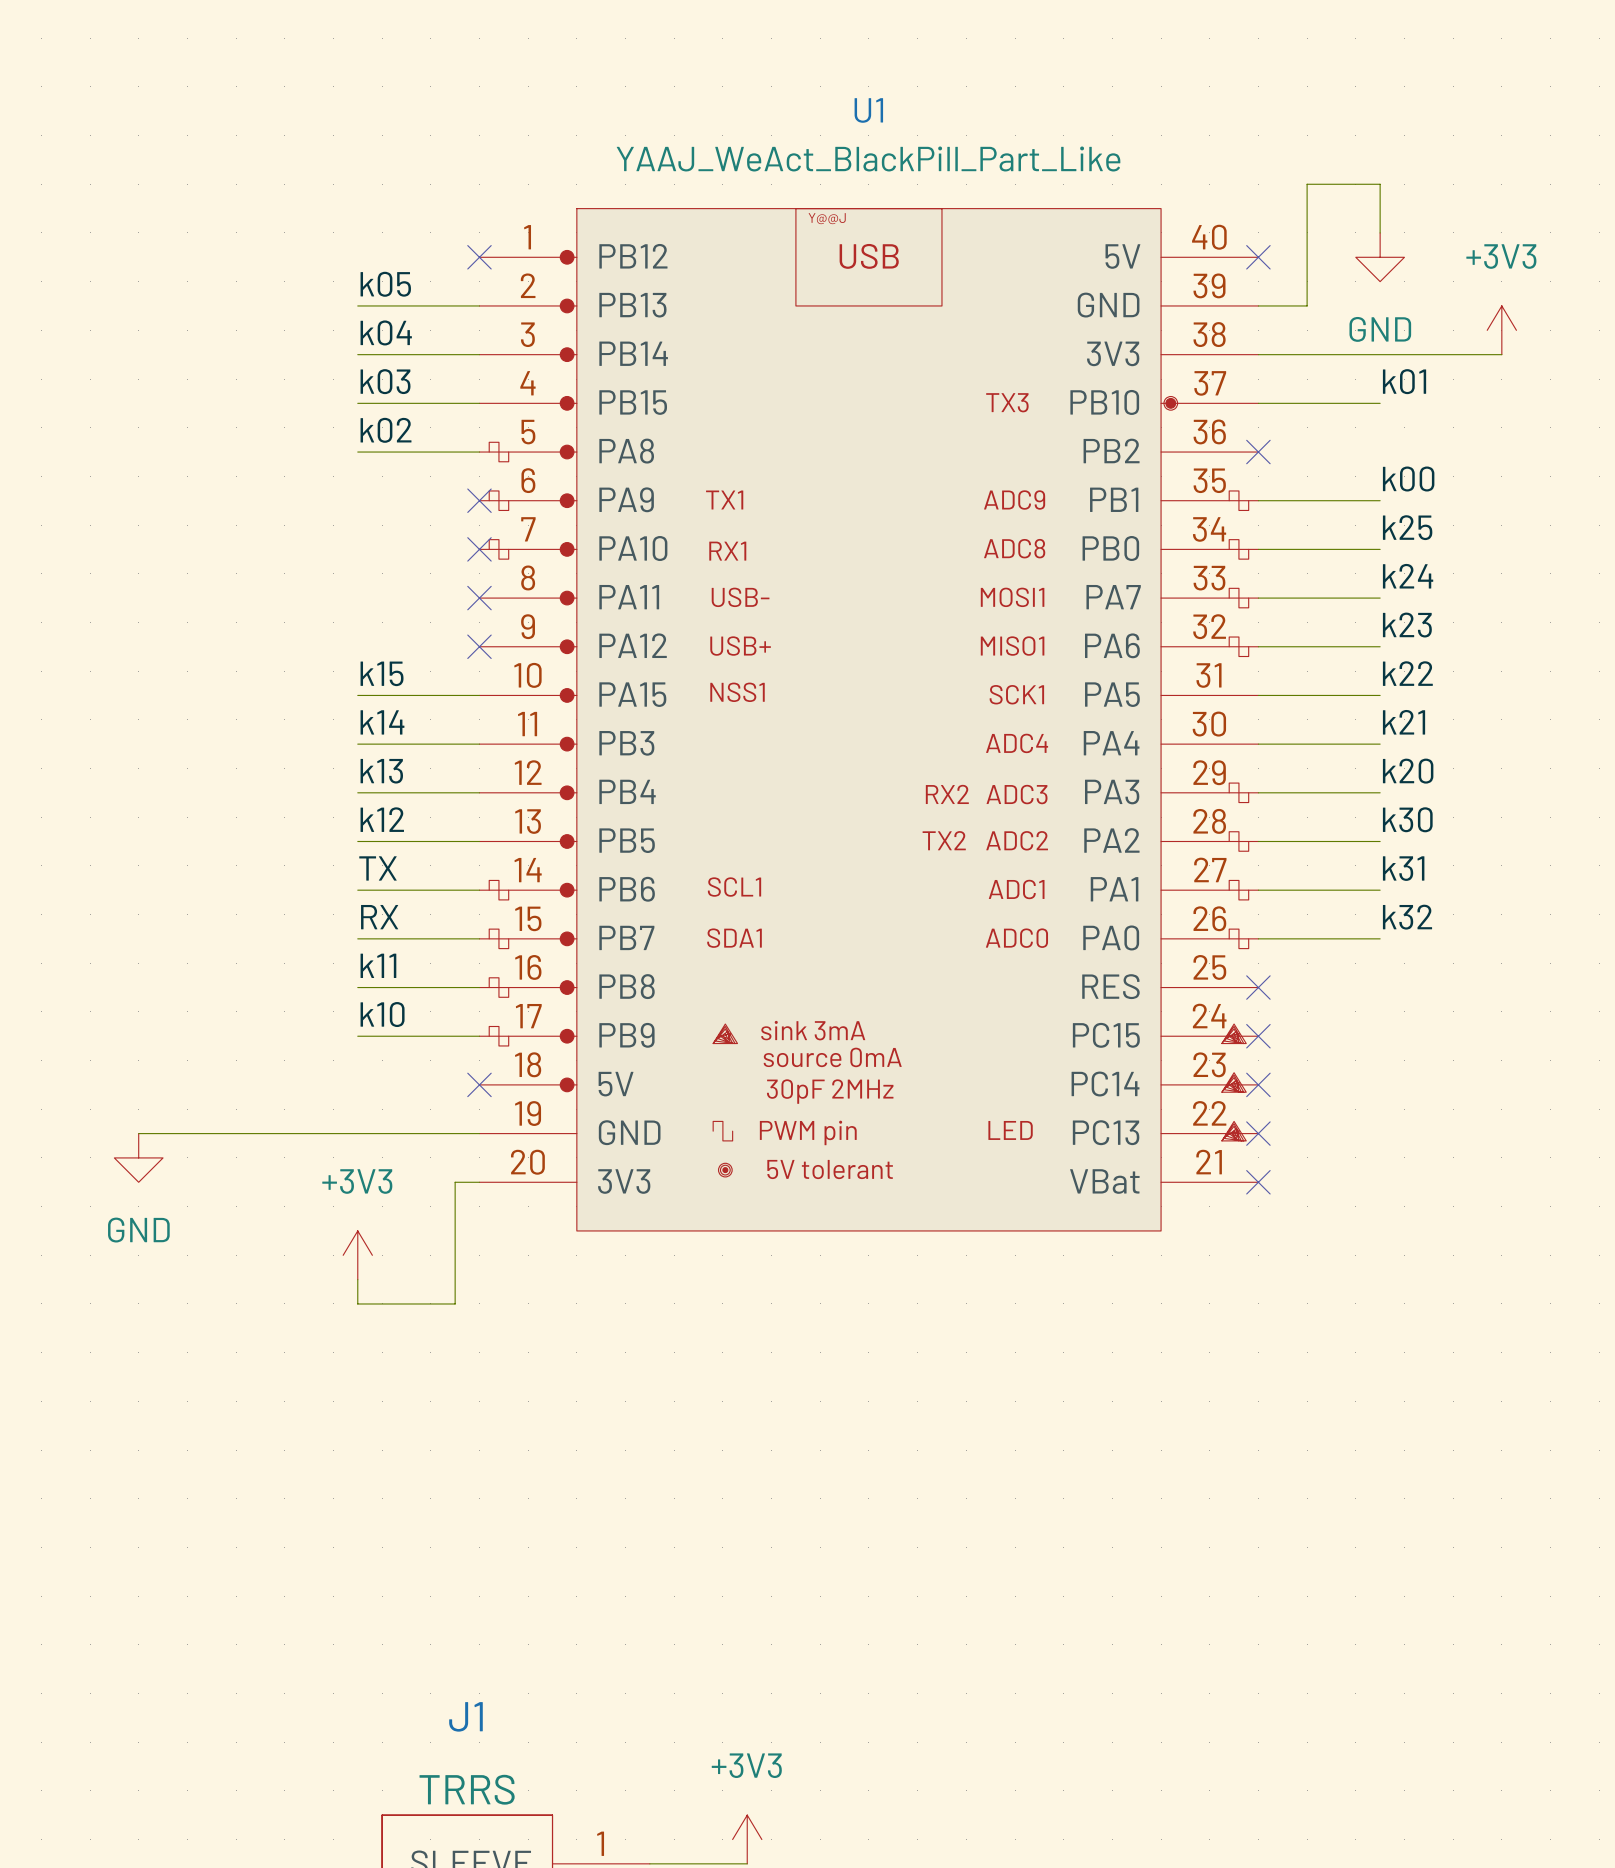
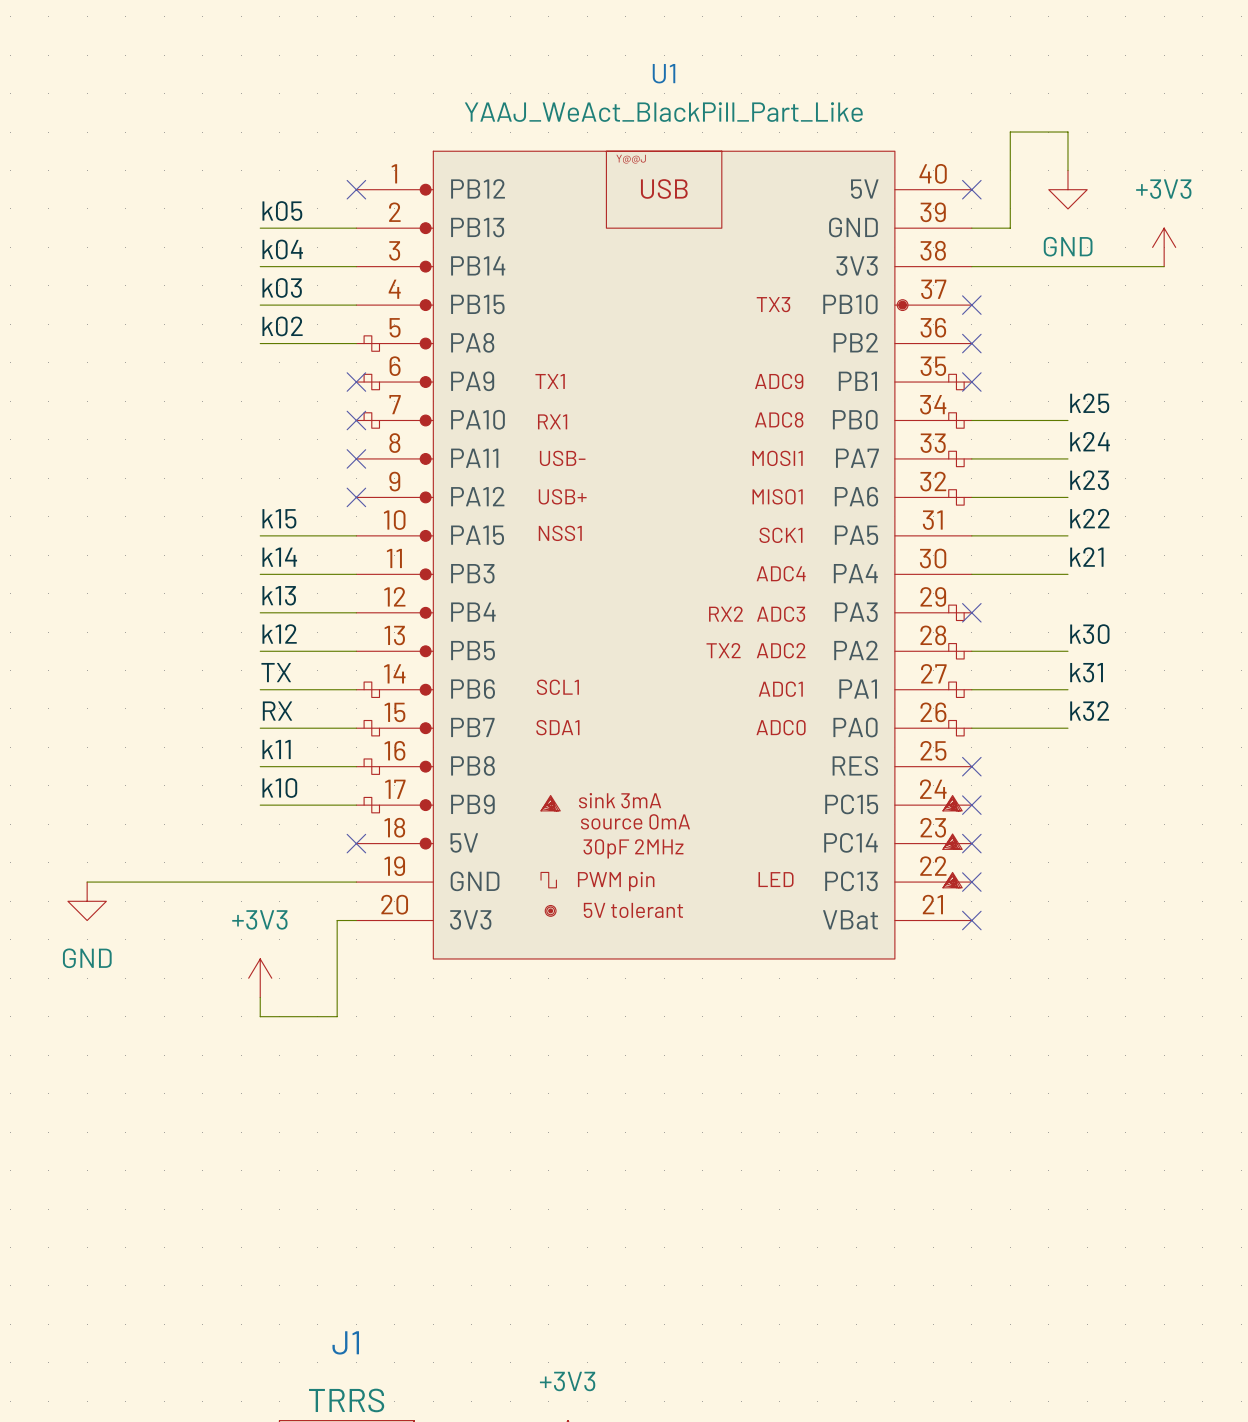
label: k01 (1404, 381) -> none
wire: (1258, 403) (1380, 403) -> none
no-connect mark: none -> (971, 305)
label: k00 (1408, 479) -> none
wire: (1258, 500) (1380, 500) -> none
no-connect mark: none -> (971, 382)
label: k20 (1408, 771) -> none
wire: (1258, 792) (1380, 792) -> none
no-connect mark: none -> (971, 612)

